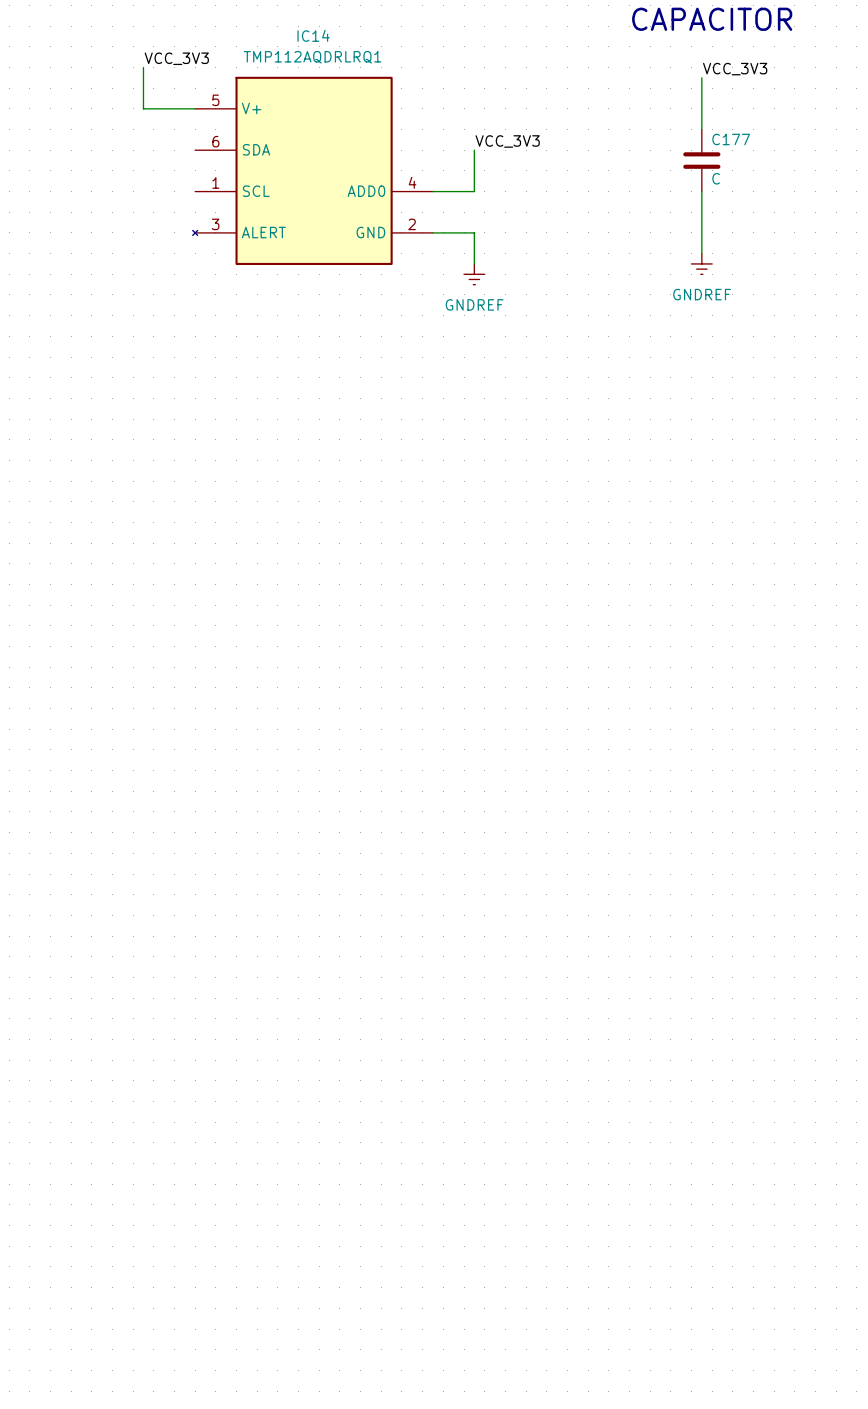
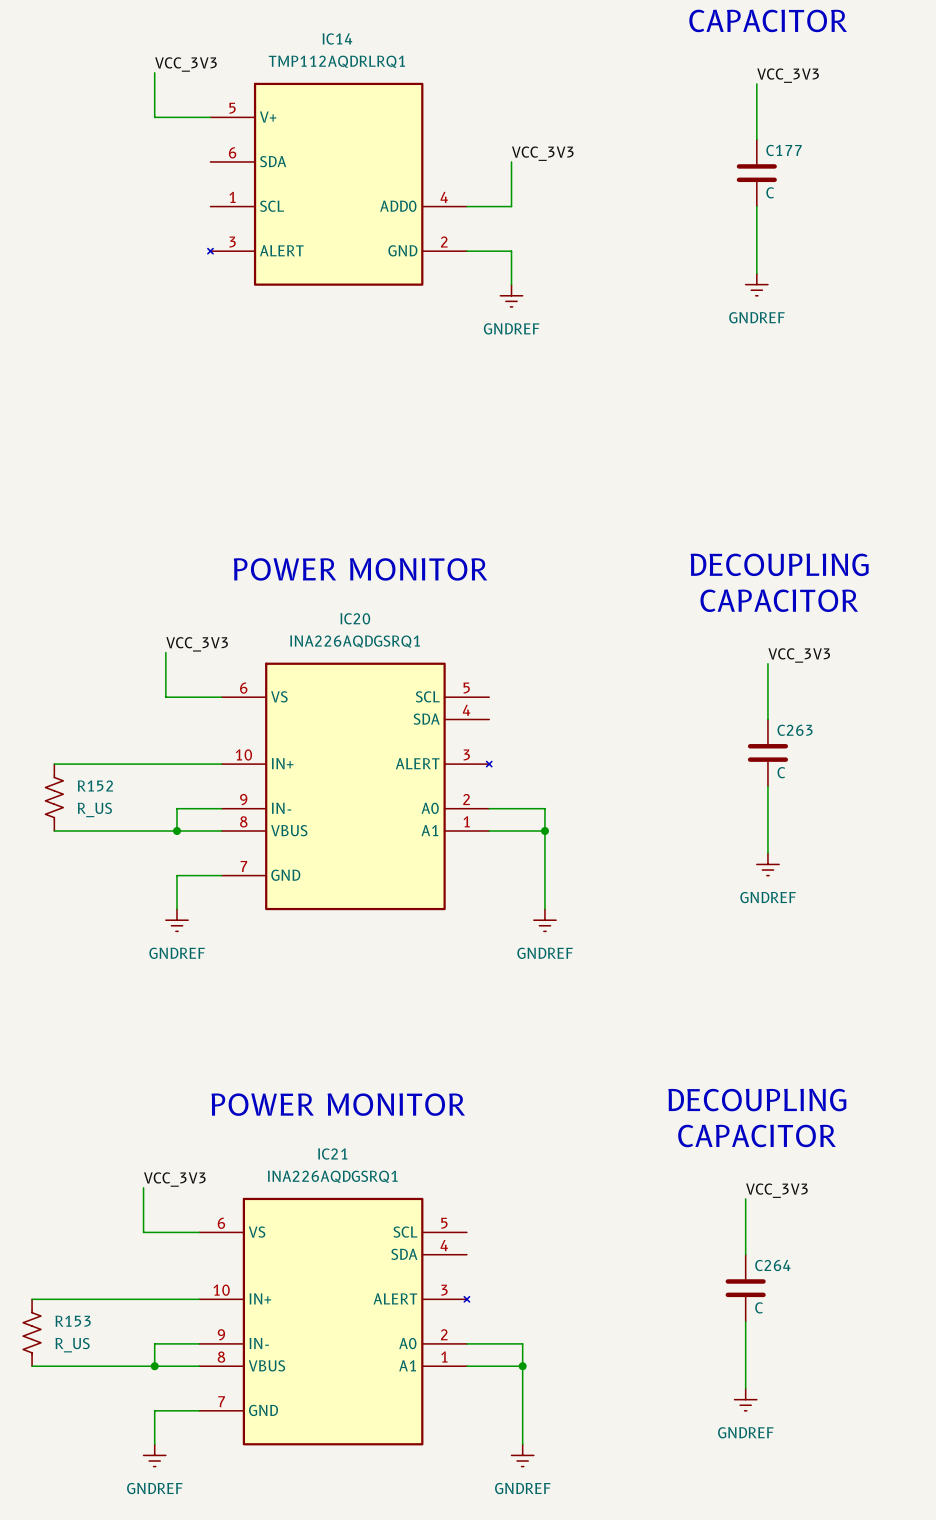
text: none -> DECOUPLING (779, 564)
text: none -> POWER MONITOR (360, 569)
text: none -> CAPACITOR (779, 600)
label: none -> VCC_3V3 (197, 644)
wire: none -> (165, 652) (165, 697) (221, 697)
label: none -> VCC_3V3 (799, 655)
wire: none -> (767, 663) (767, 719)
C263: none -> C (767, 752)
wire: none -> (54, 764) (221, 764)
IC20: none -> INA226AQDGSRQ1 (356, 786)
wire: none -> (767, 786) (767, 853)
R152: none -> R_US (54, 797)
wire: none -> (221, 808) (177, 808) (177, 831)
wire: none -> (489, 808) (544, 808) (544, 909)
wire: none -> (54, 831) (221, 831)
junction: none -> (177, 831)
wire: none -> (489, 831) (544, 831)
junction: none -> (544, 831)
power symbol: none -> GNDREF (767, 864)
wire: none -> (221, 875) (177, 875) (177, 909)
power symbol: none -> GNDREF (177, 920)
power symbol: none -> GNDREF (544, 920)
text: none -> DECOUPLING (757, 1100)
text: none -> POWER MONITOR (338, 1104)
text: none -> CAPACITOR (756, 1135)
label: none -> VCC_3V3 (174, 1179)
wire: none -> (143, 1187) (143, 1232) (199, 1232)
label: none -> VCC_3V3 (776, 1190)
wire: none -> (745, 1198) (745, 1254)
C264: none -> C (745, 1288)
wire: none -> (32, 1299) (199, 1299)
IC21: none -> INA226AQDGSRQ1 (334, 1321)
wire: none -> (745, 1321) (745, 1388)
R153: none -> R_US (32, 1332)
wire: none -> (199, 1343) (154, 1343) (154, 1366)
wire: none -> (466, 1343) (522, 1343) (522, 1444)
wire: none -> (32, 1366) (199, 1366)
junction: none -> (154, 1366)
wire: none -> (466, 1366) (522, 1366)
junction: none -> (522, 1366)
power symbol: none -> GNDREF (745, 1399)
wire: none -> (199, 1410) (154, 1410) (154, 1444)
power symbol: none -> GNDREF (154, 1455)
power symbol: none -> GNDREF (522, 1455)

